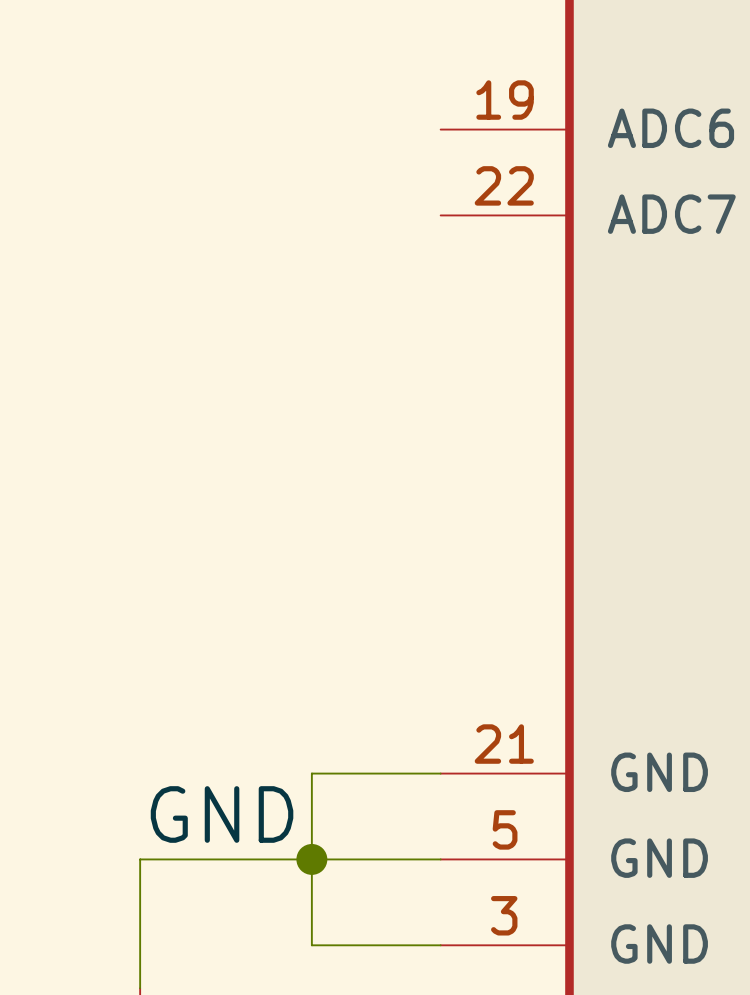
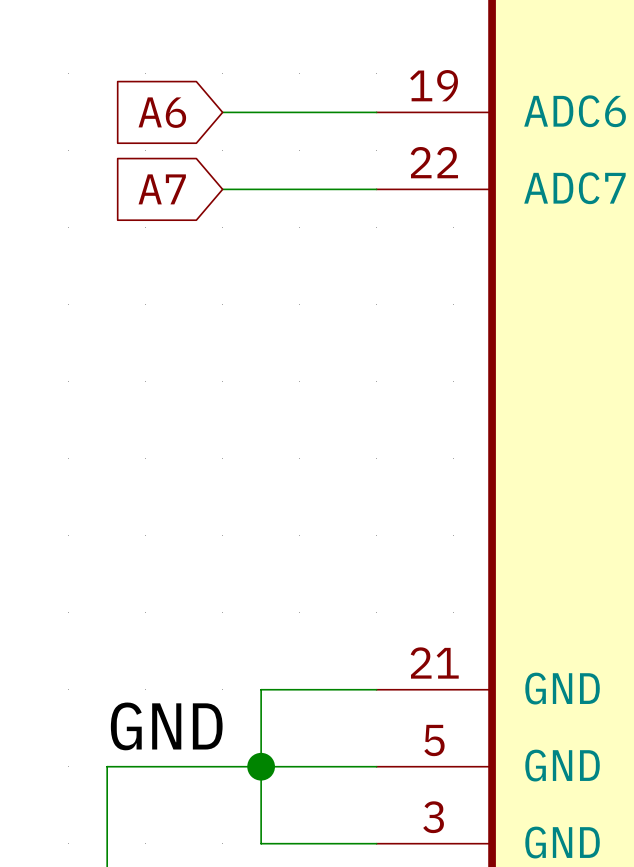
global label: none -> A6 (162, 112)
wire: none -> (222, 112) (376, 112)
global label: none -> A7 (162, 189)
wire: none -> (222, 189) (376, 189)

